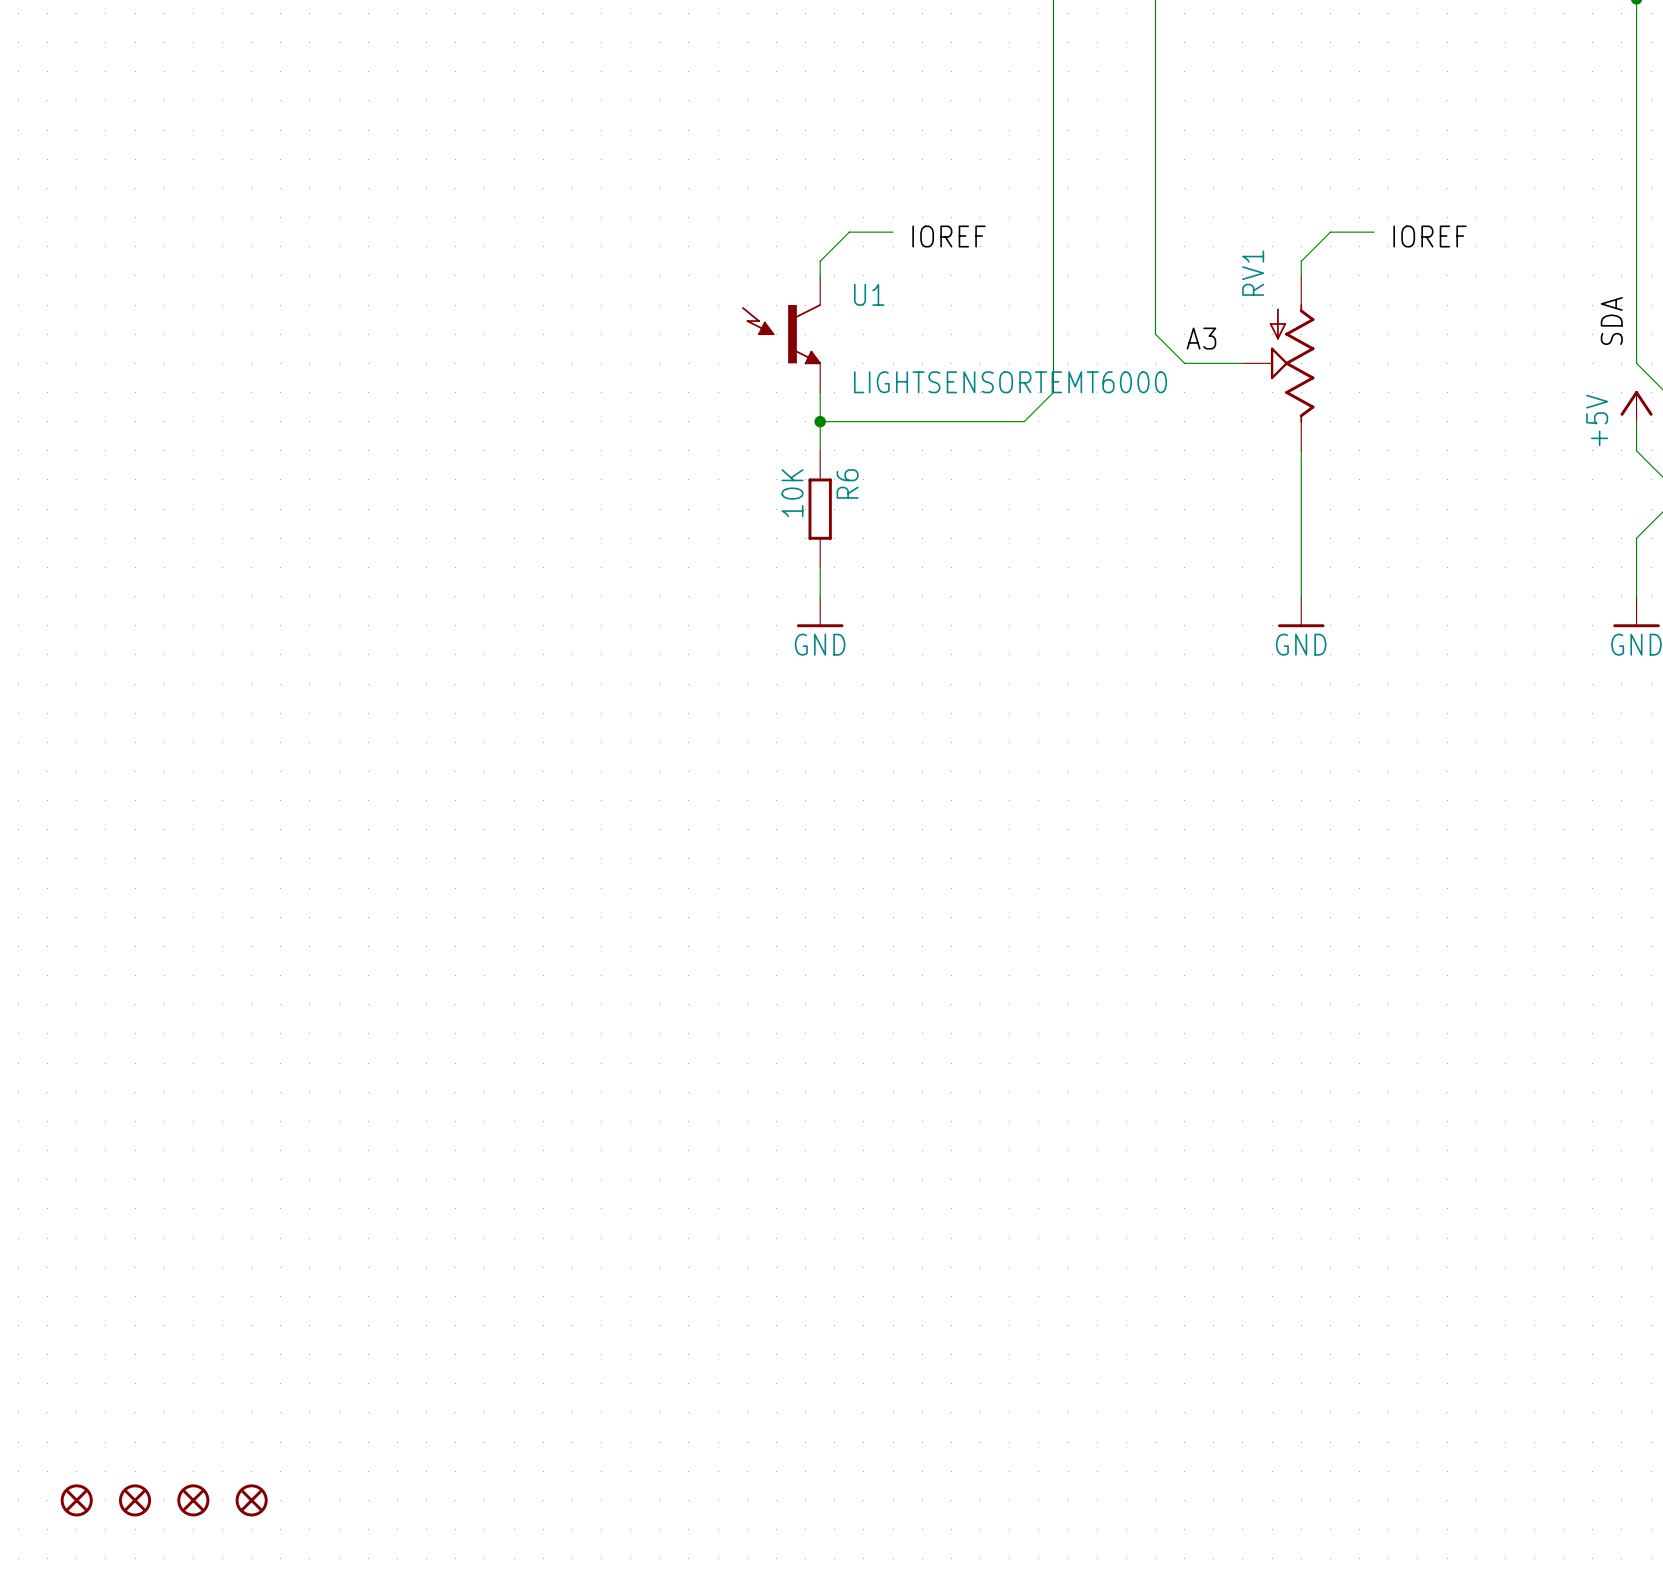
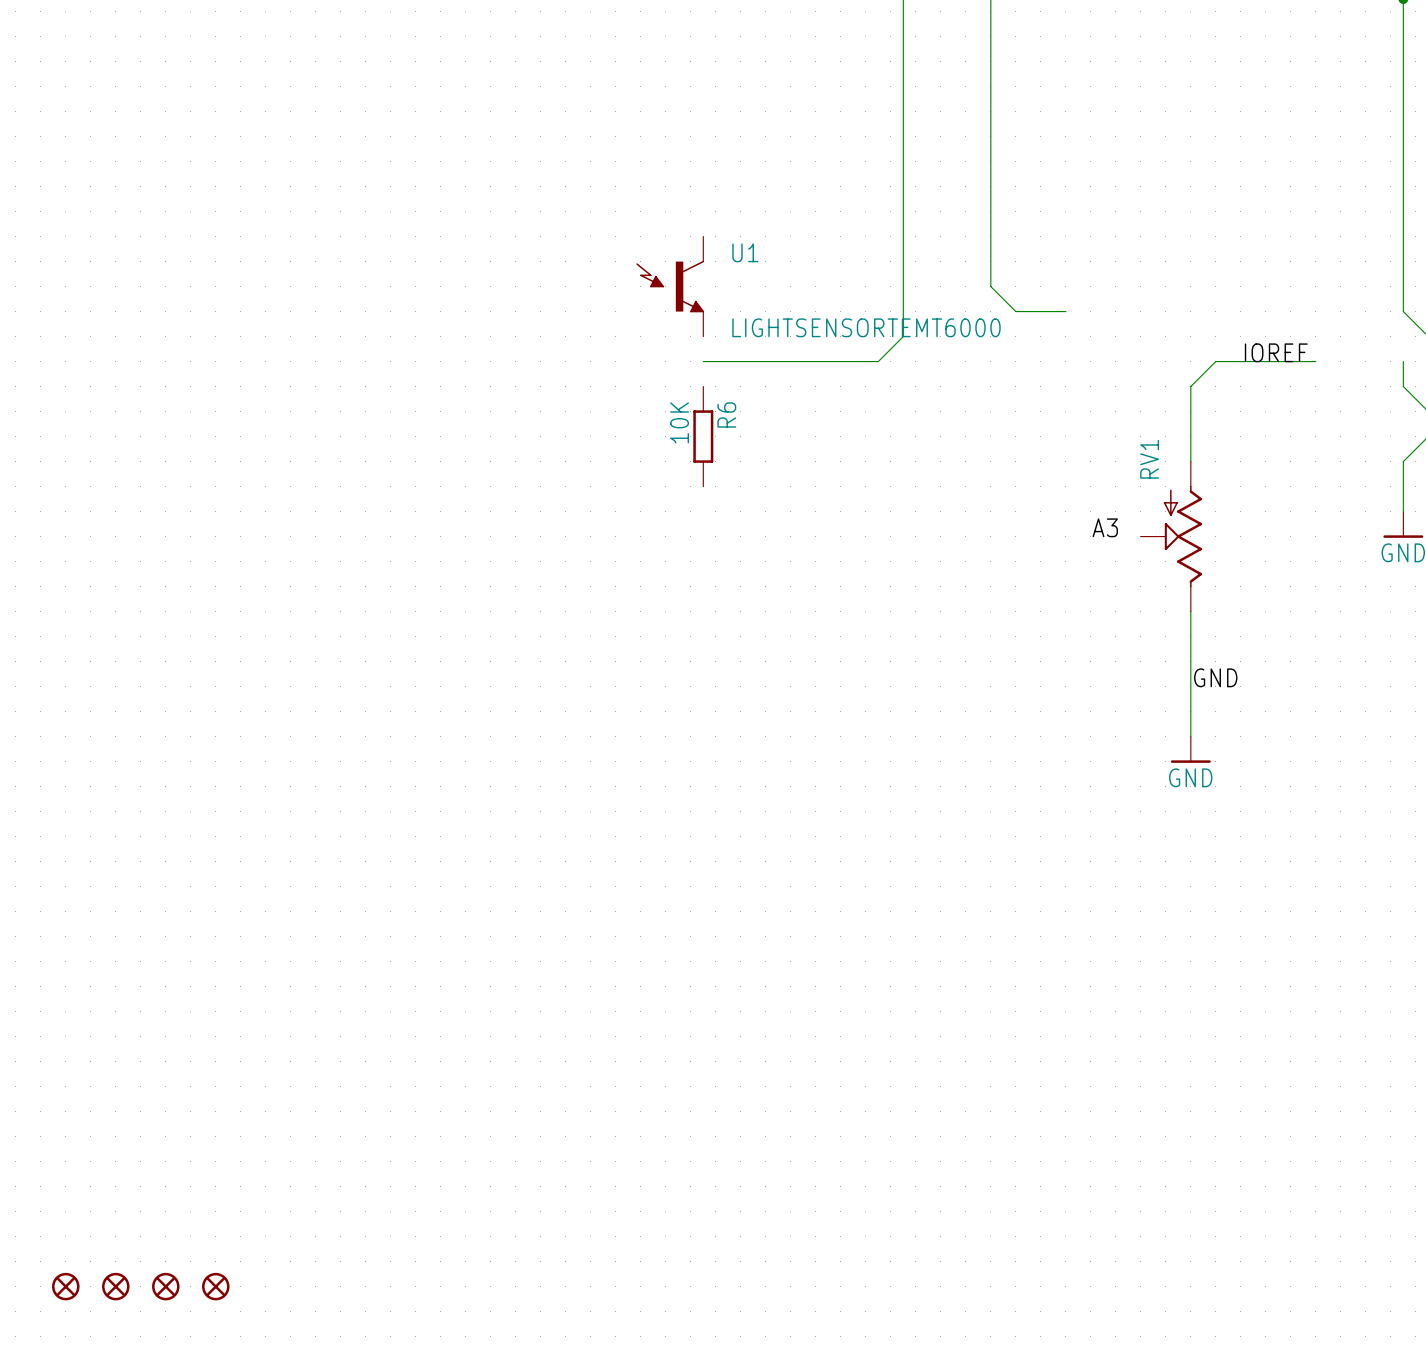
wire: (893, 232) (849, 232) (820, 261) (820, 275) -> none
wire: (1374, 232) (1330, 232) (1301, 261) (1301, 275) -> none
label: IOREF (948, 236) -> none
label position: IOREF (1430, 236) -> IOREF (1276, 352)
label: SDA (1611, 321) -> none
label: A3 (1201, 338) -> none
RV1 position: (1278, 363) -> (1171, 536)
wire: (820, 392) (820, 450) -> none
power symbol: +5V (1636, 406) -> none
junction: (820, 421) -> none
wire: none -> (1315, 361) (1215, 361) (1190, 386) (1190, 461)
wire: (1301, 450) (1301, 596) -> (1190, 611) (1190, 736)
wire: (820, 567) (820, 596) -> none
power symbol: GND (820, 611) -> none
power symbol: GND (1301, 611) -> none
label: none -> A3 (1105, 527)
label: none -> GND (1215, 677)
power symbol: none -> GND (1190, 749)

